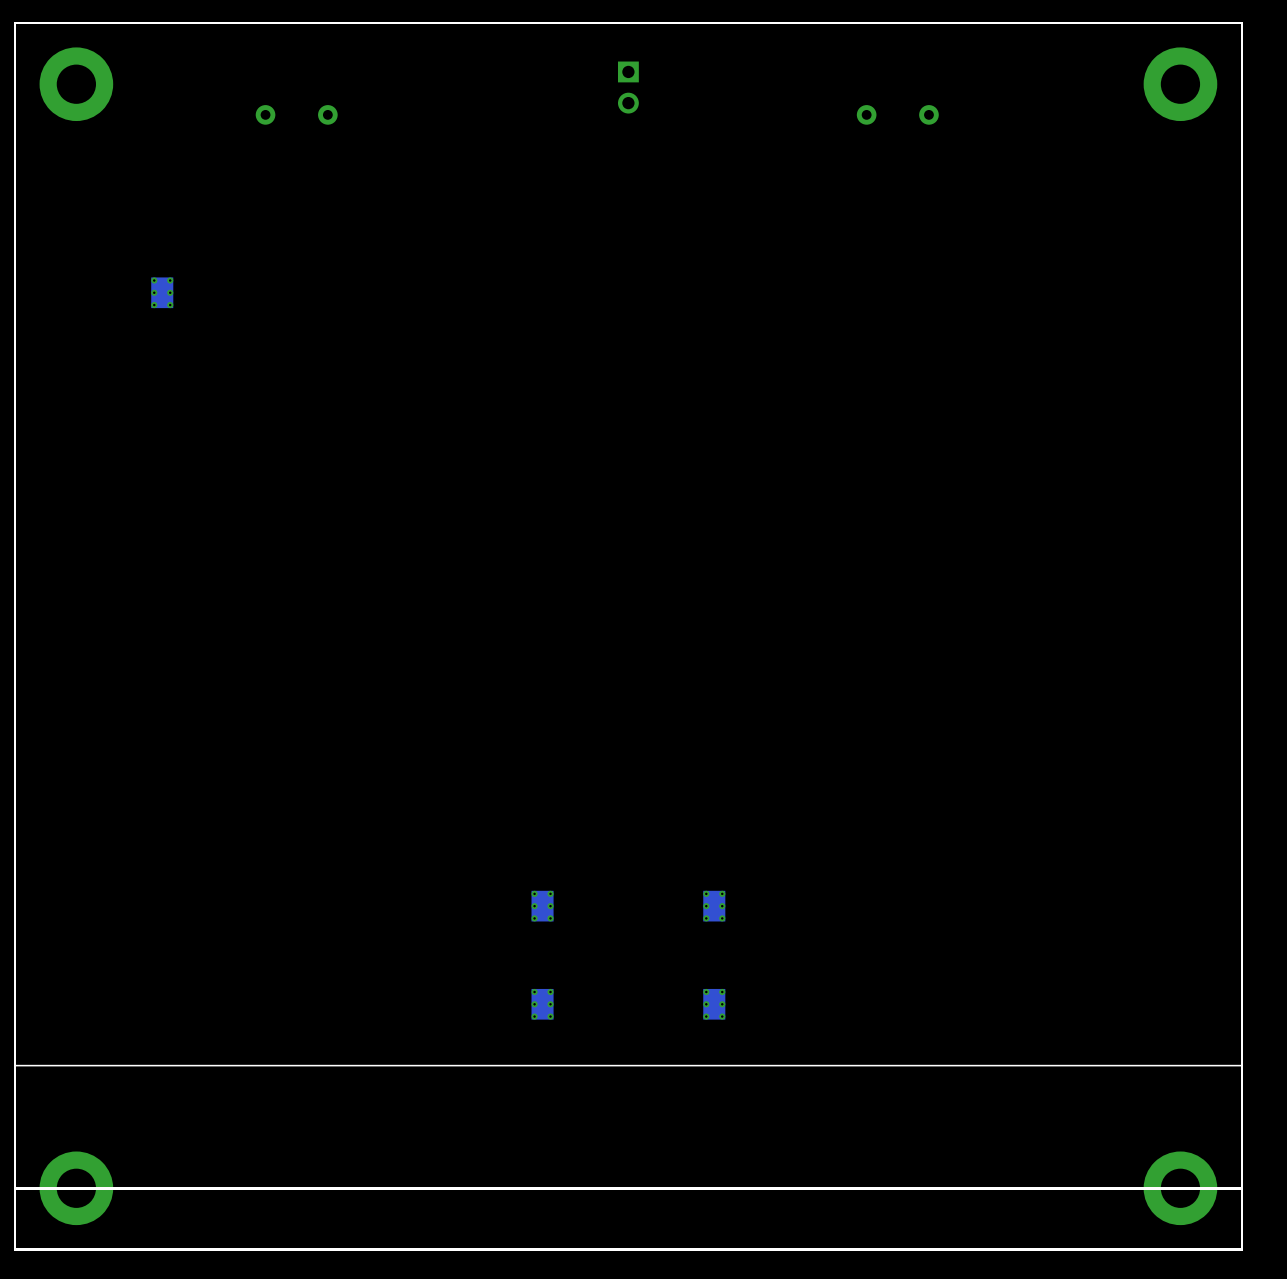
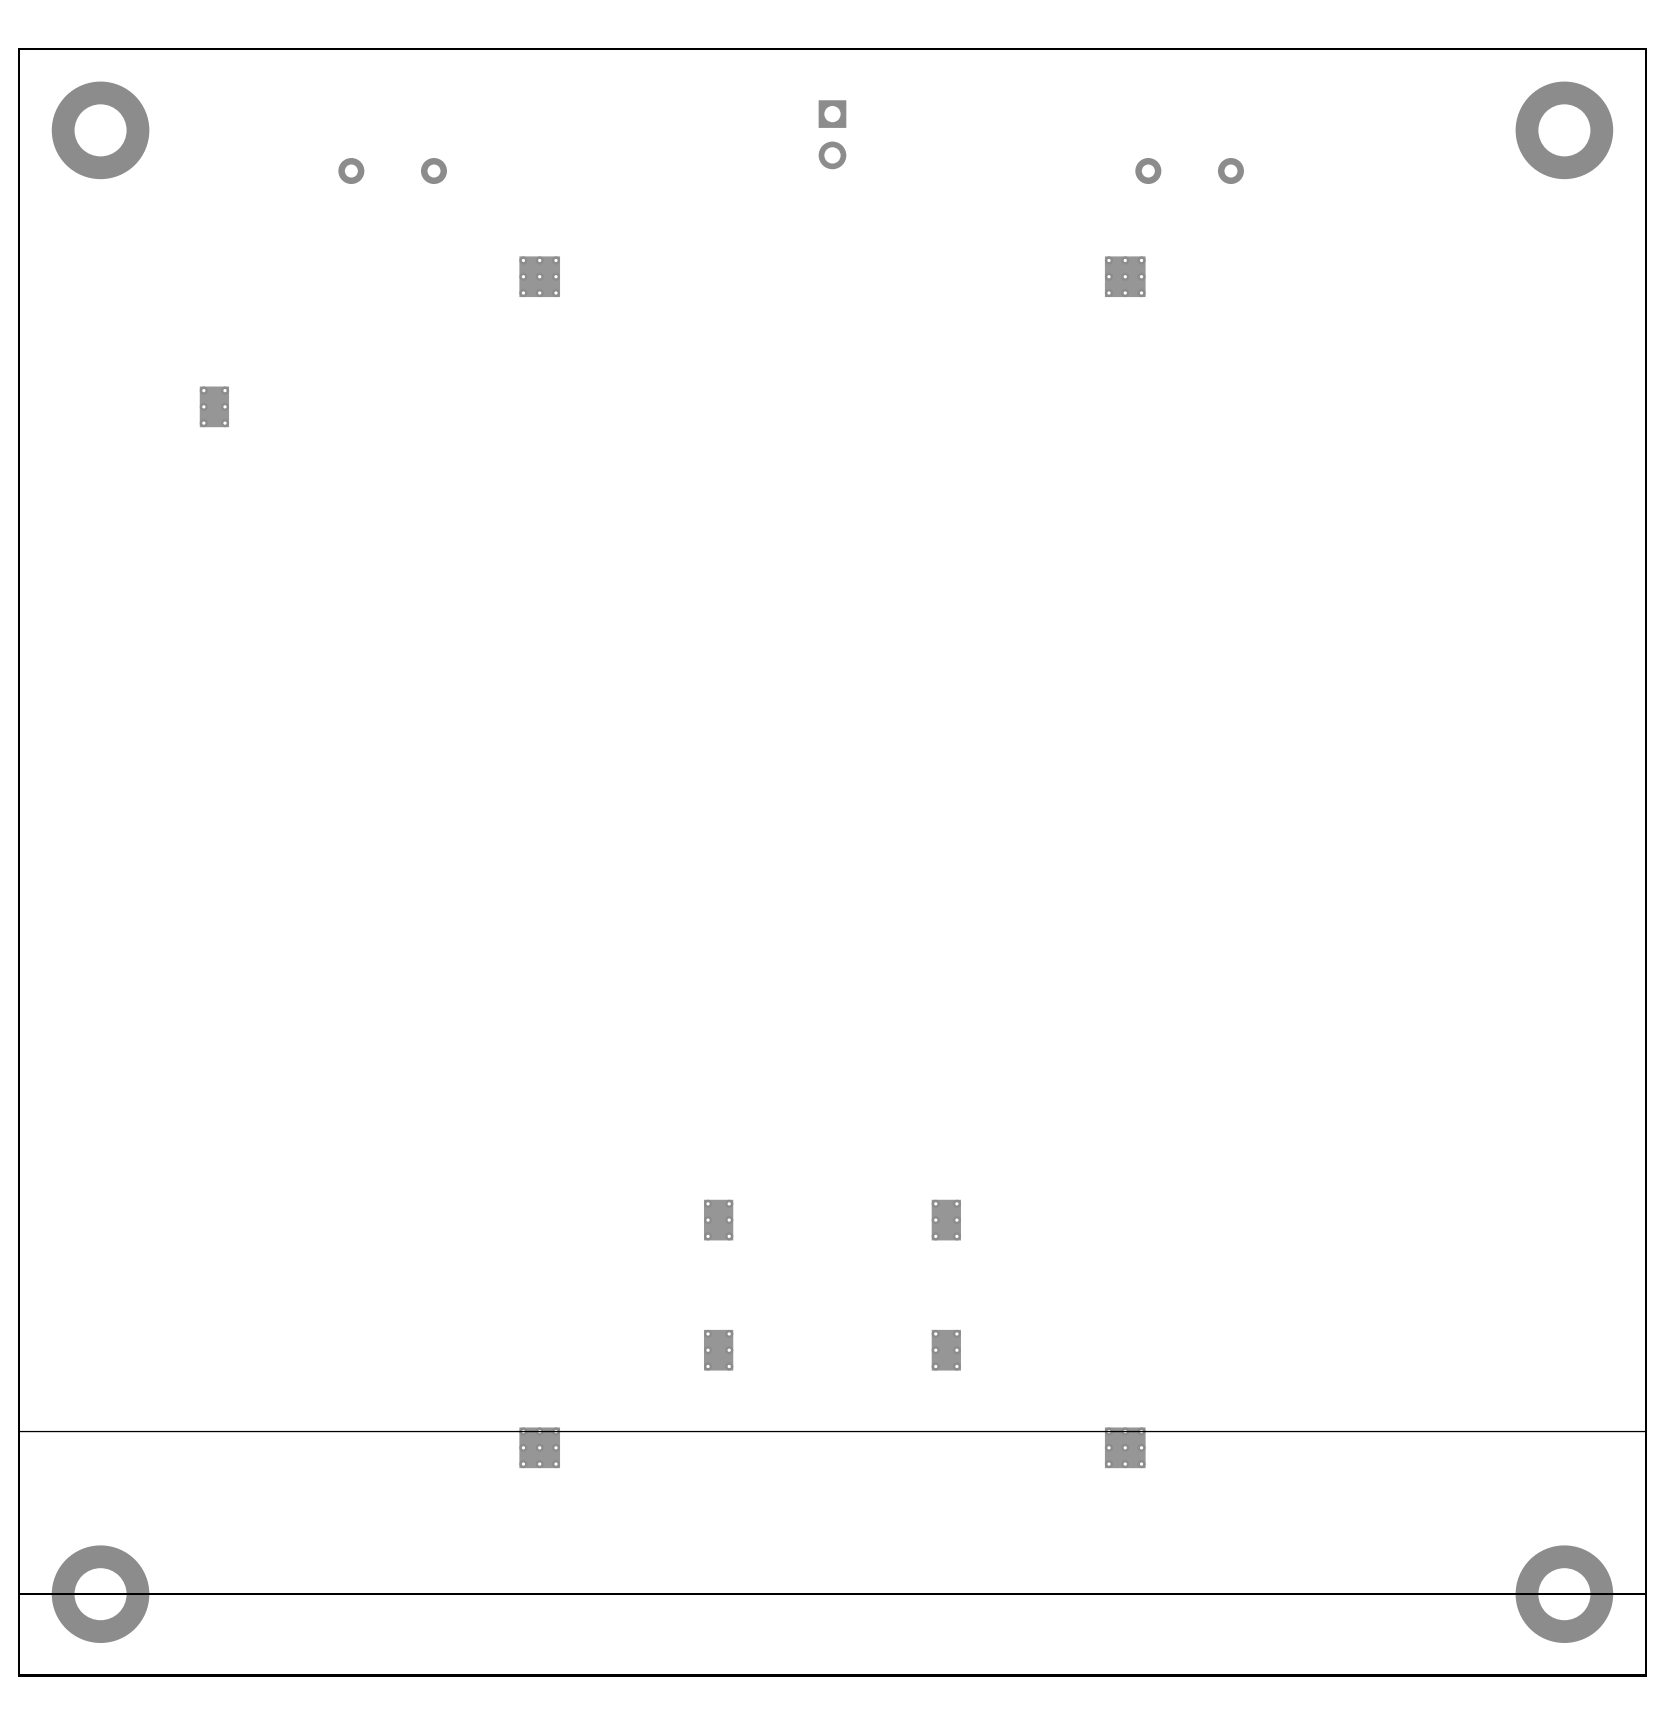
part: none -> (539, 276)
part: none -> (1125, 276)
part: none -> (539, 1447)
part: none -> (1125, 1447)

